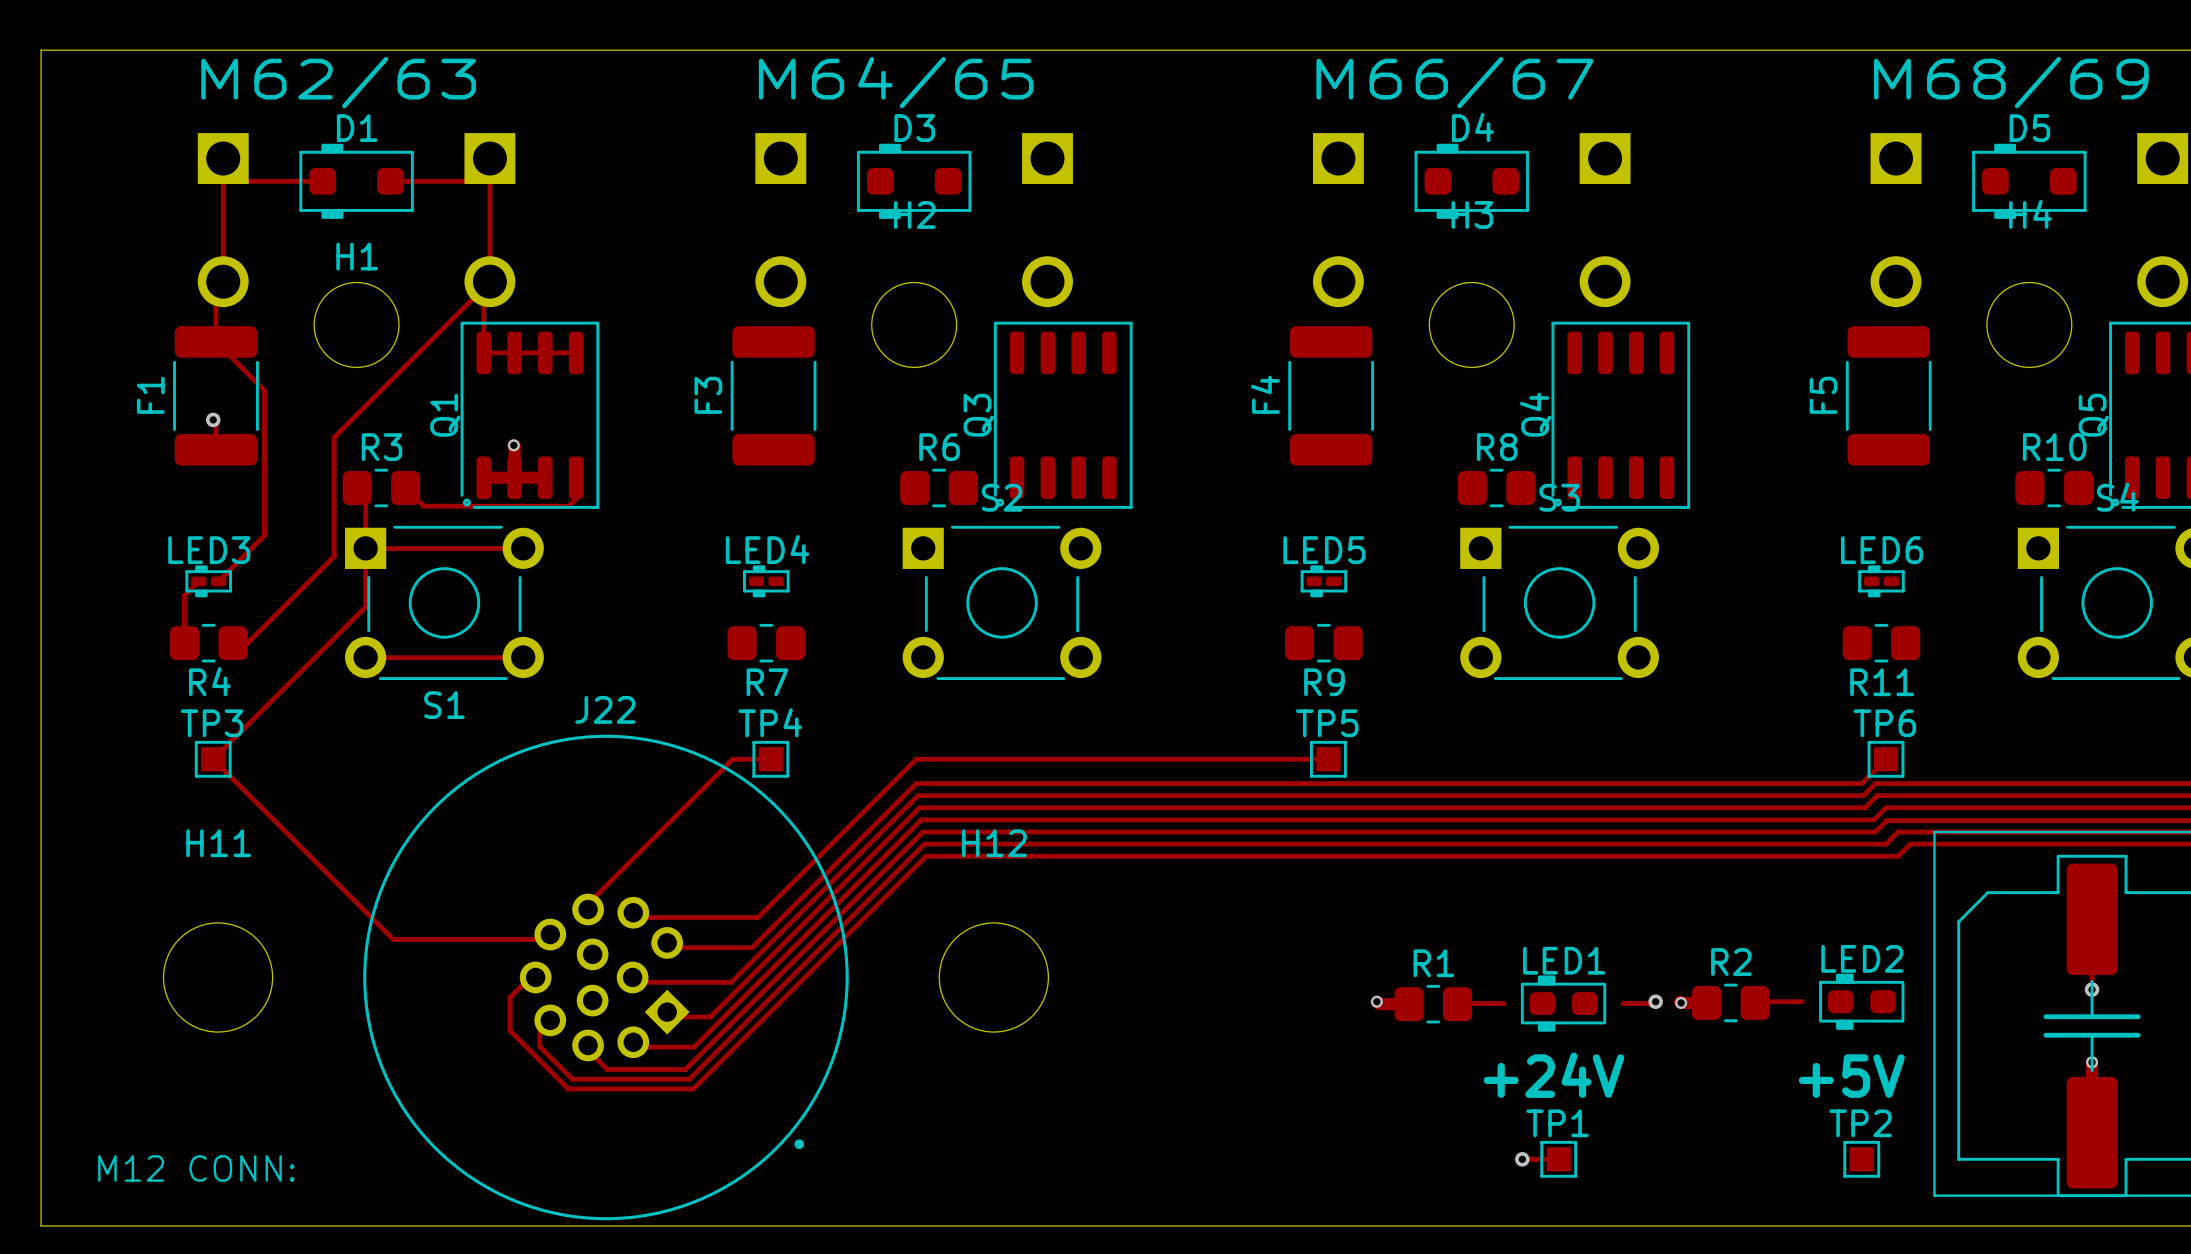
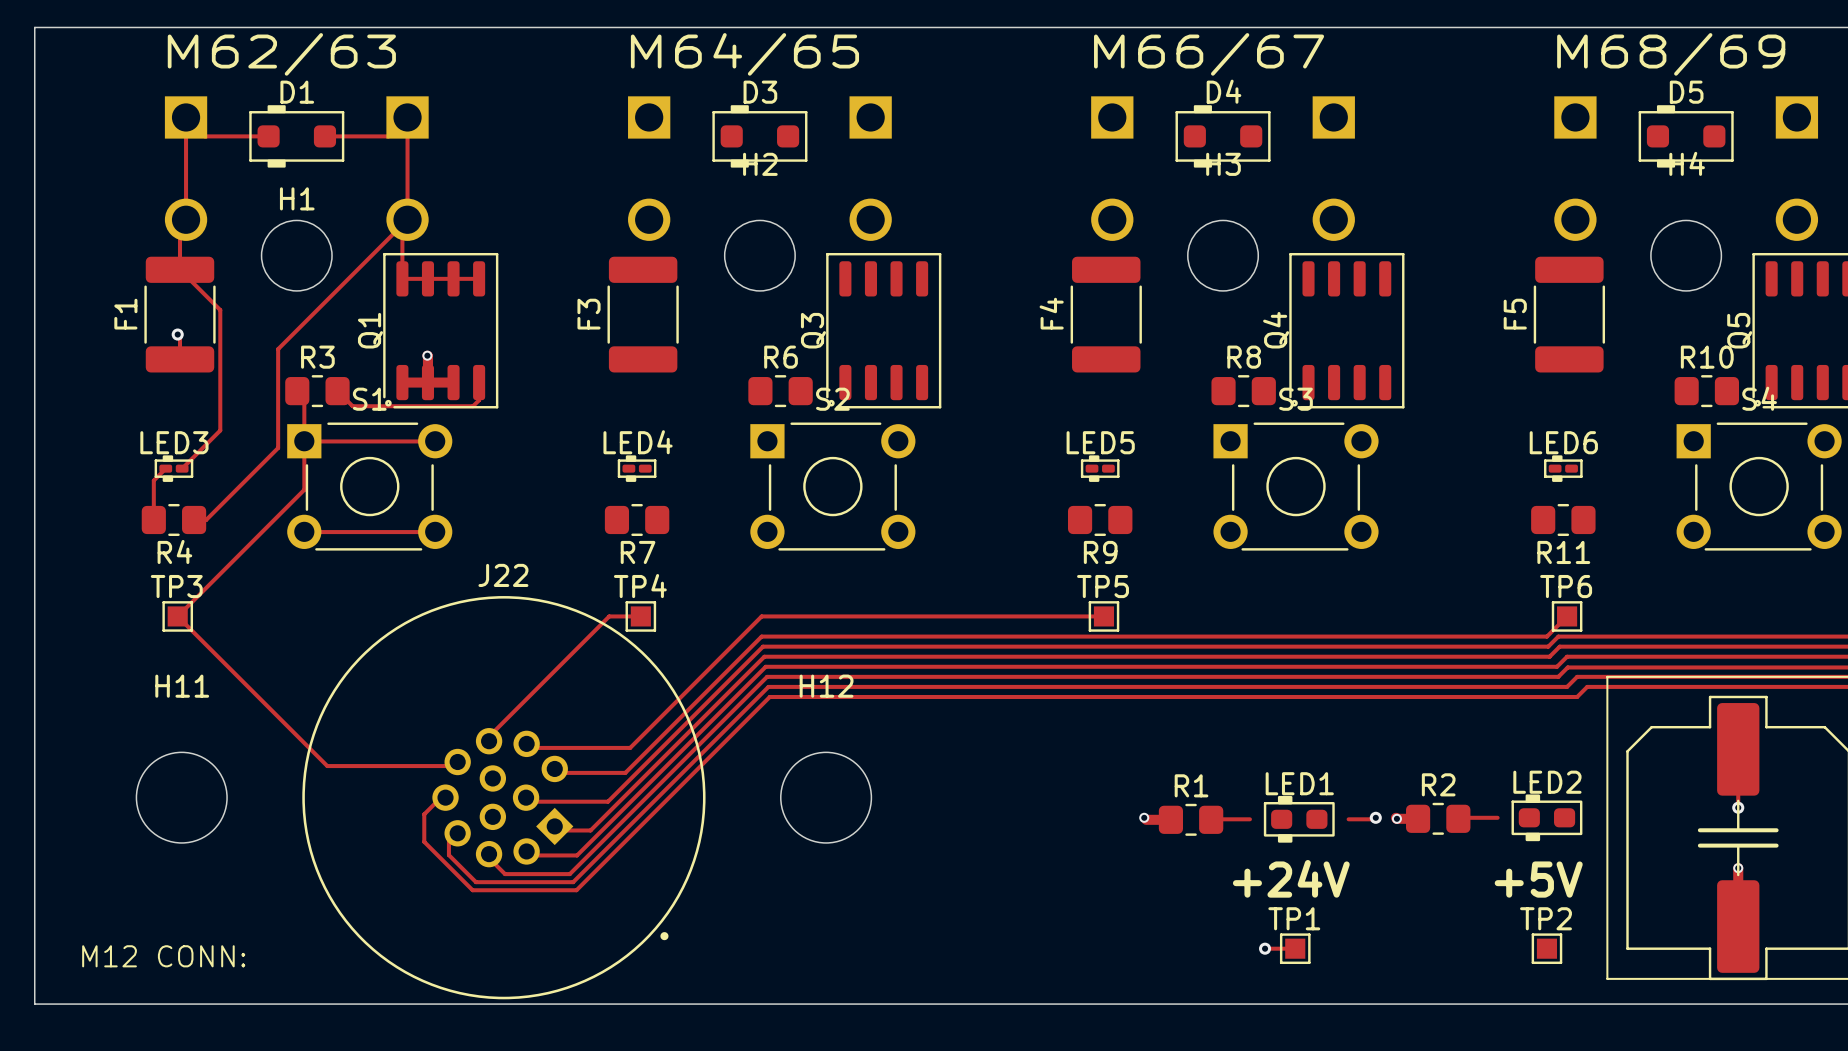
S1 name position: S1 (444, 705) -> S1 (369, 399)

